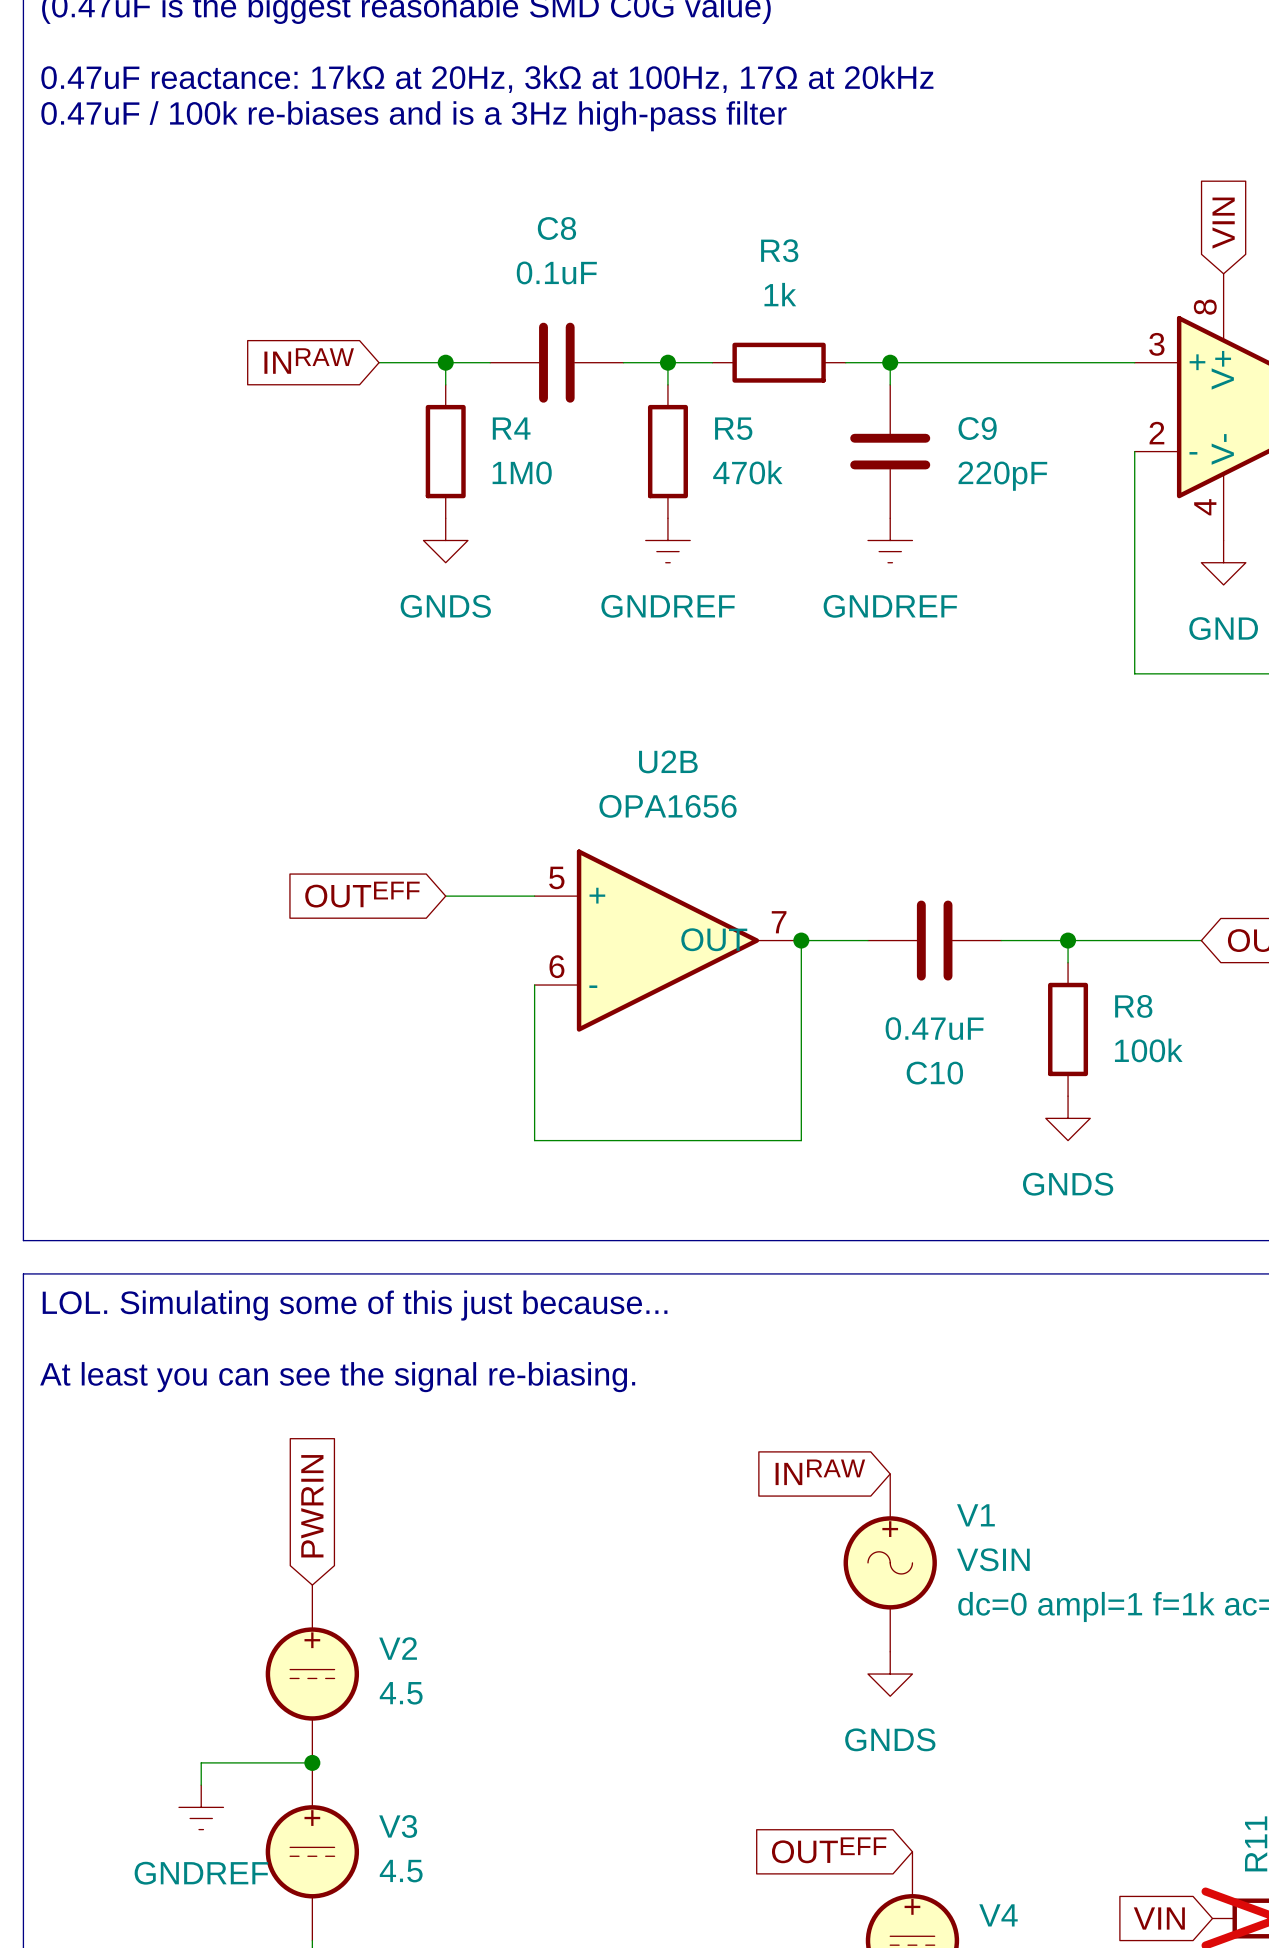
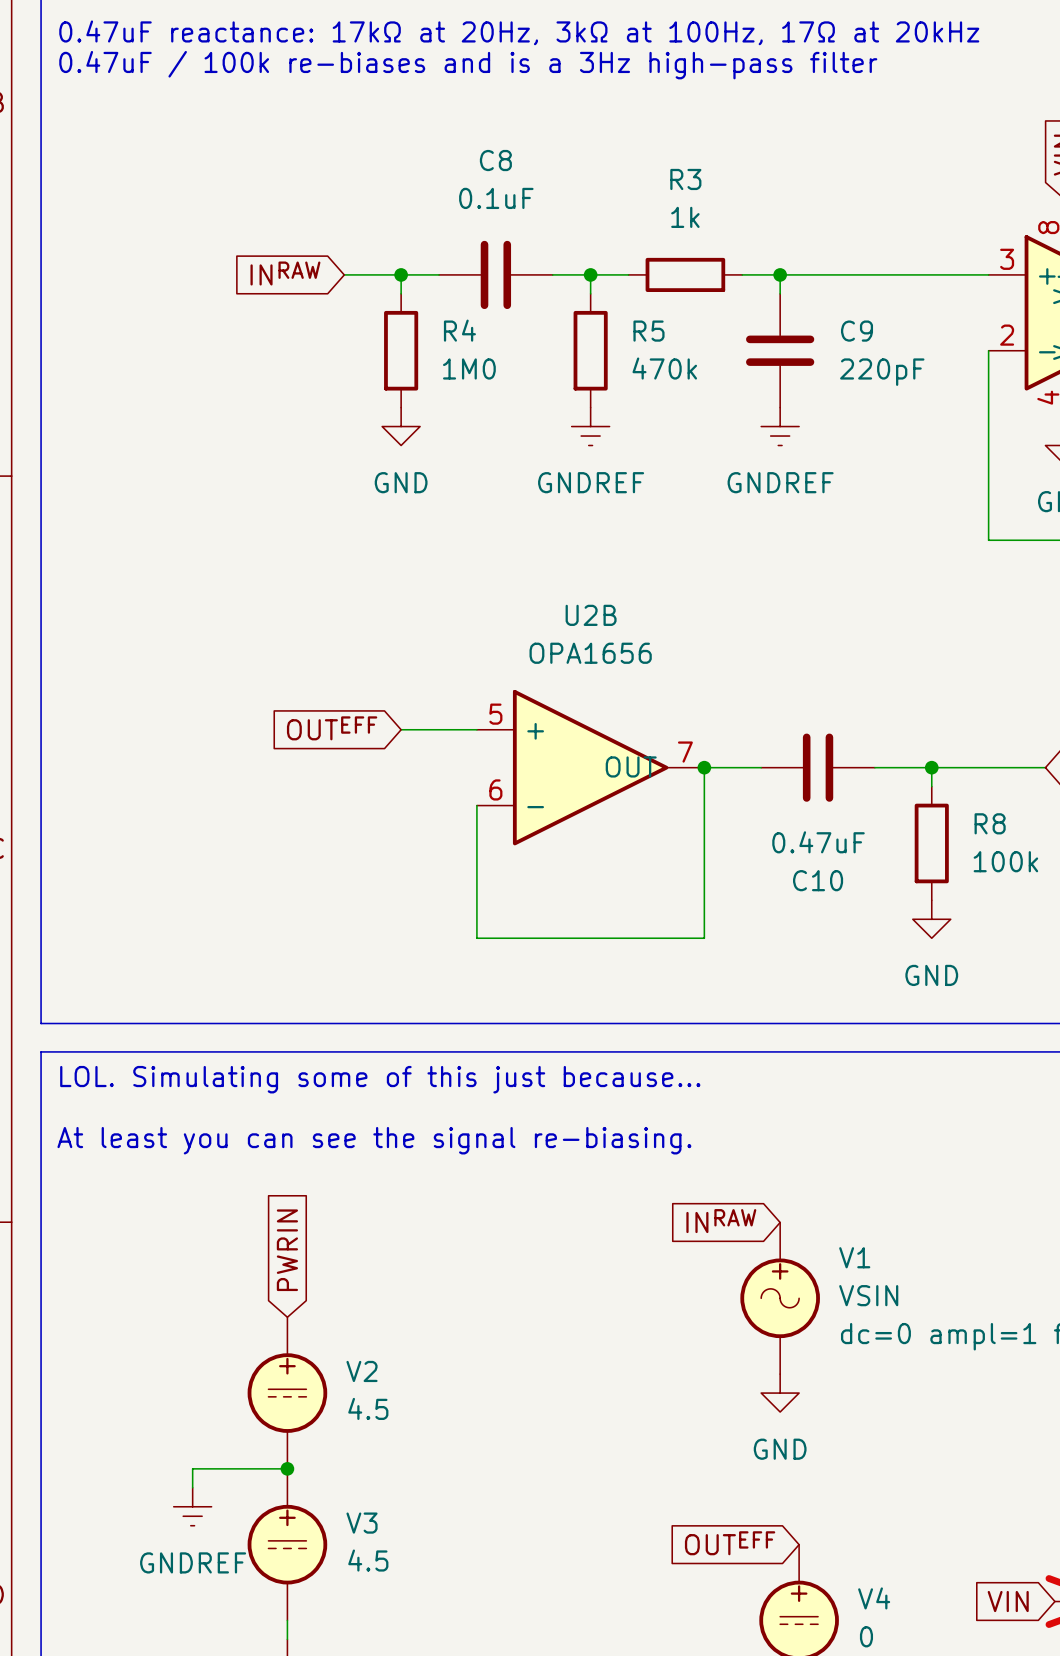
power symbol: GNDS (445, 540) -> GND (401, 426)
power symbol: GNDS (1068, 1118) -> GND (931, 919)
power symbol: GNDS (890, 1674) -> GND (780, 1393)

